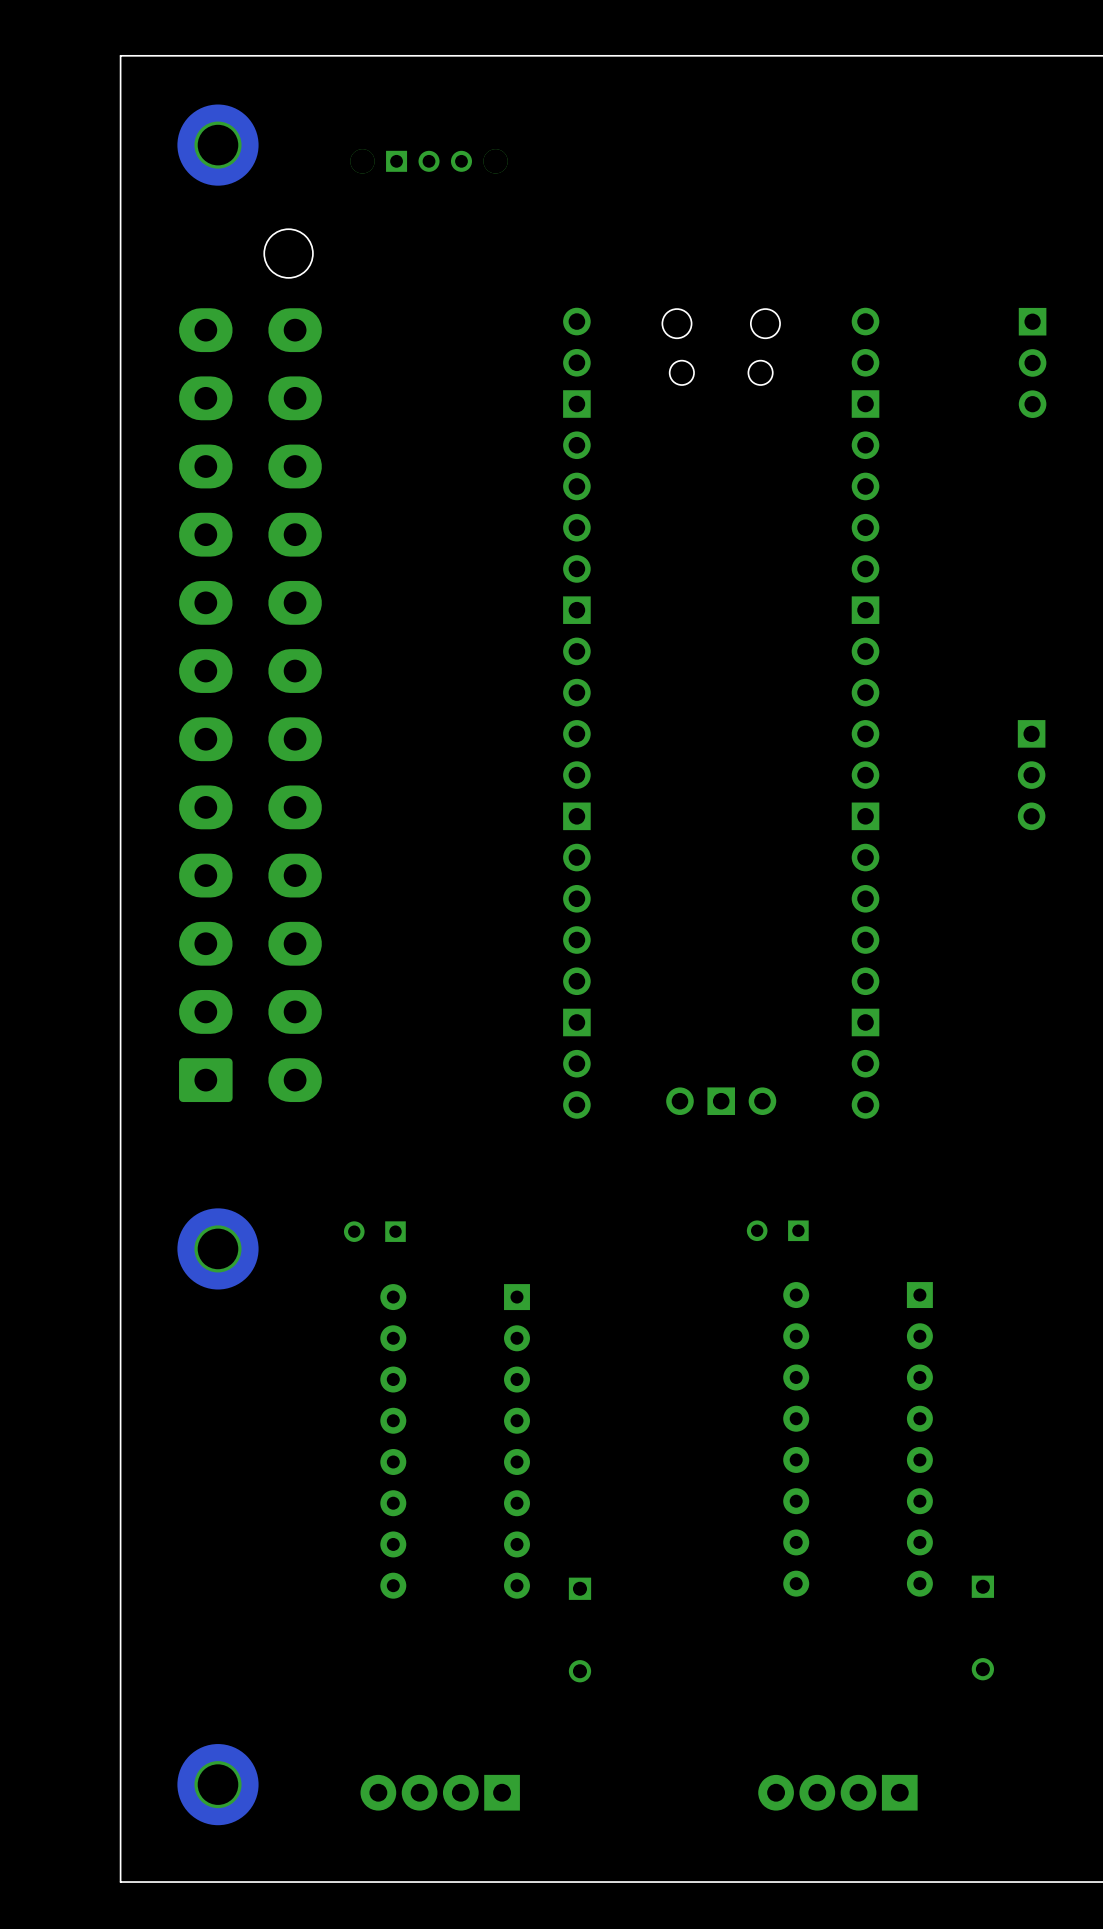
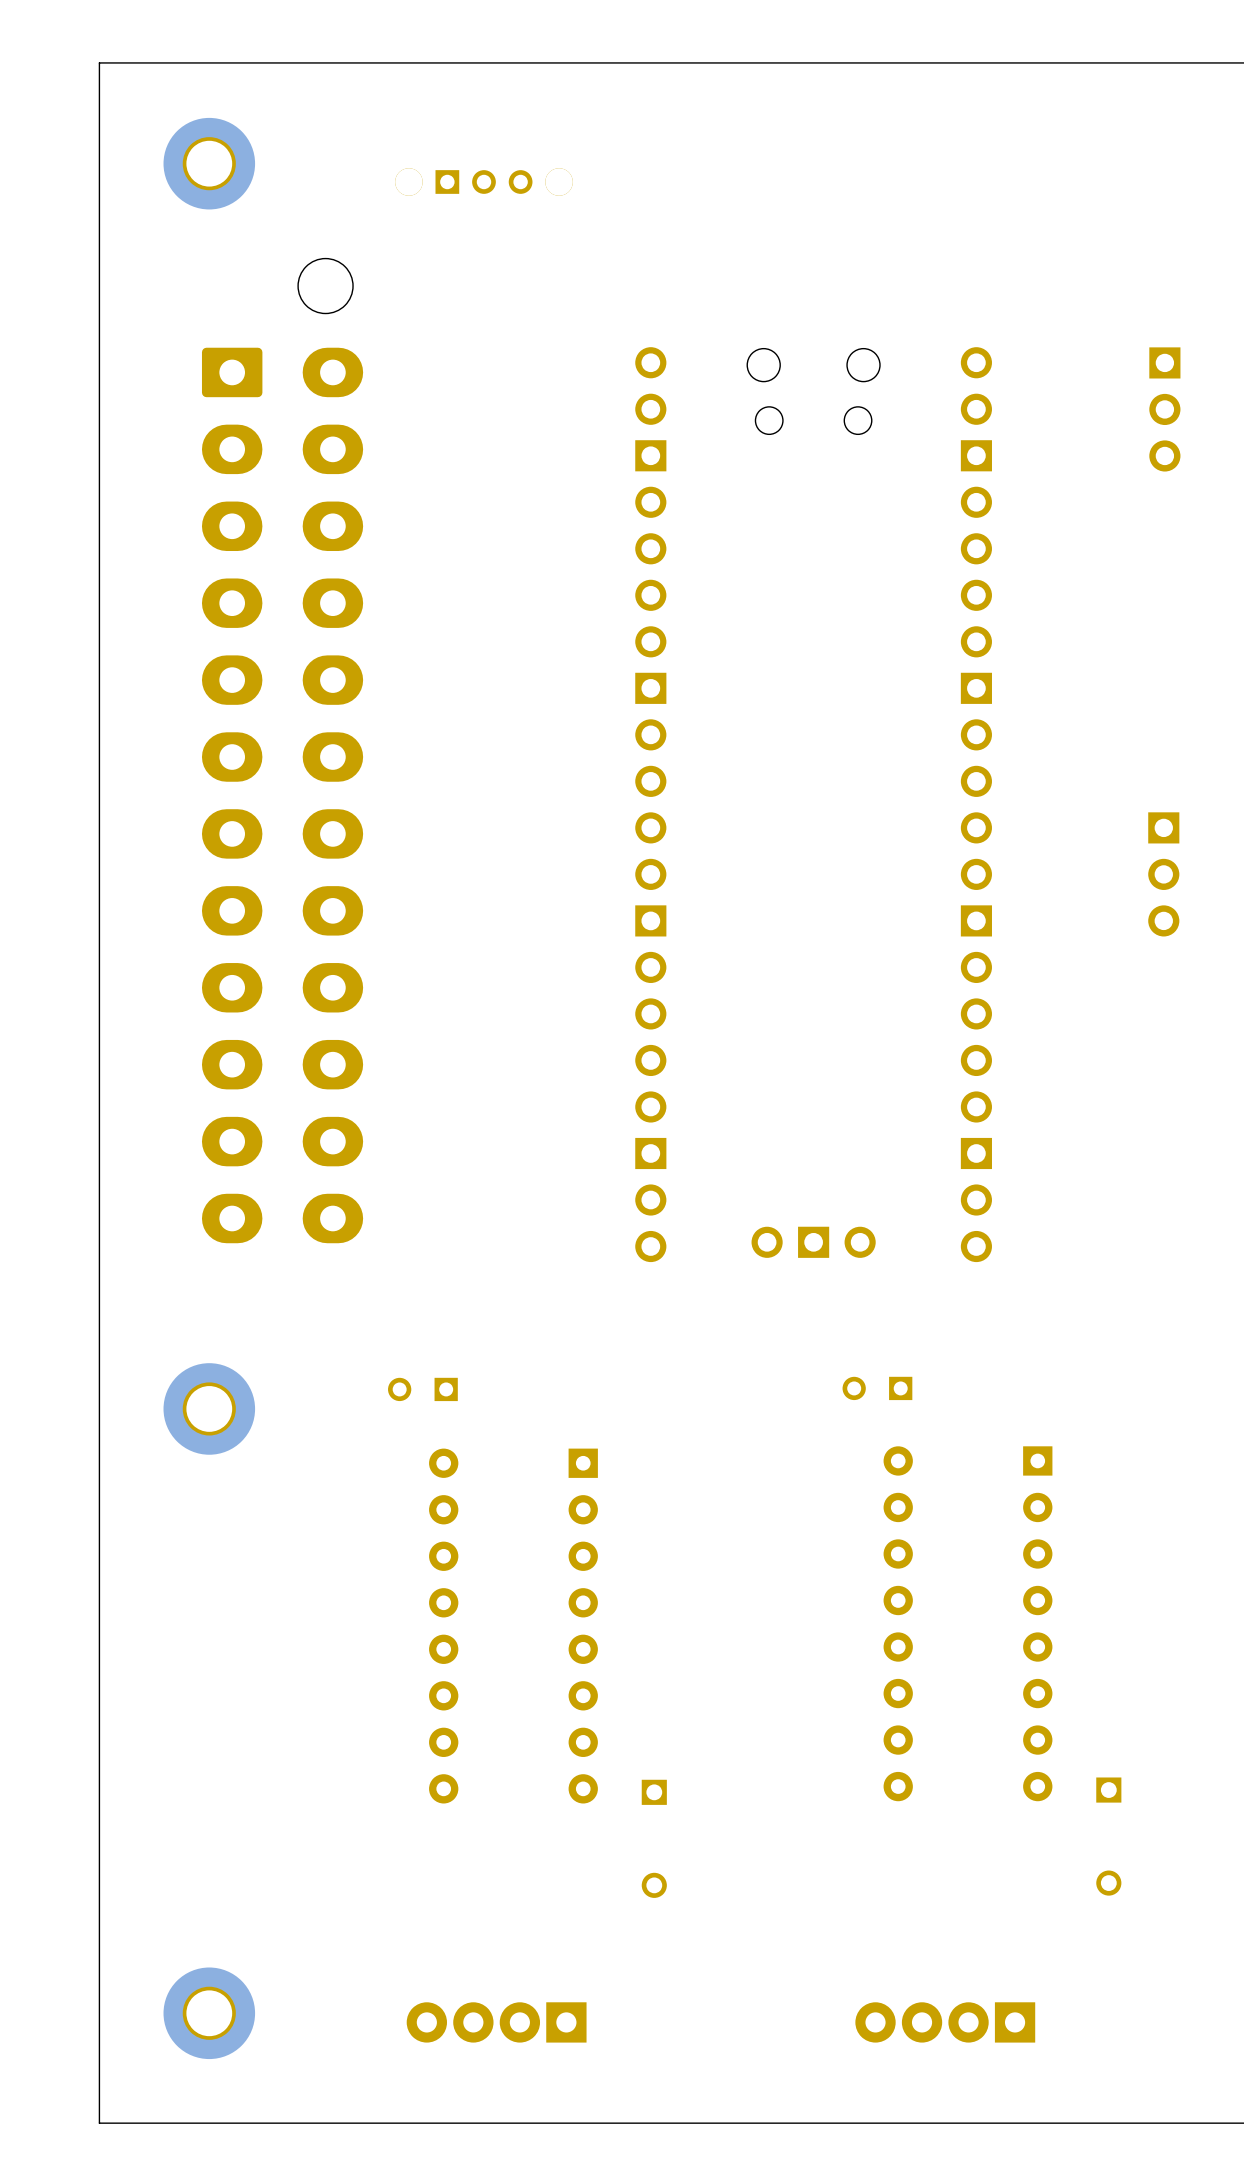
board edge: (120, 55) (120, 1882) -> (136, 62) (99, 62) (99, 2123) (136, 2123)
part position: (217, 145) -> (209, 163)
part footprint: [179, 229, 322, 1103] -> [201, 258, 364, 1244]
part position: (217, 1248) -> (209, 1408)
part position: (217, 1784) -> (209, 2013)

